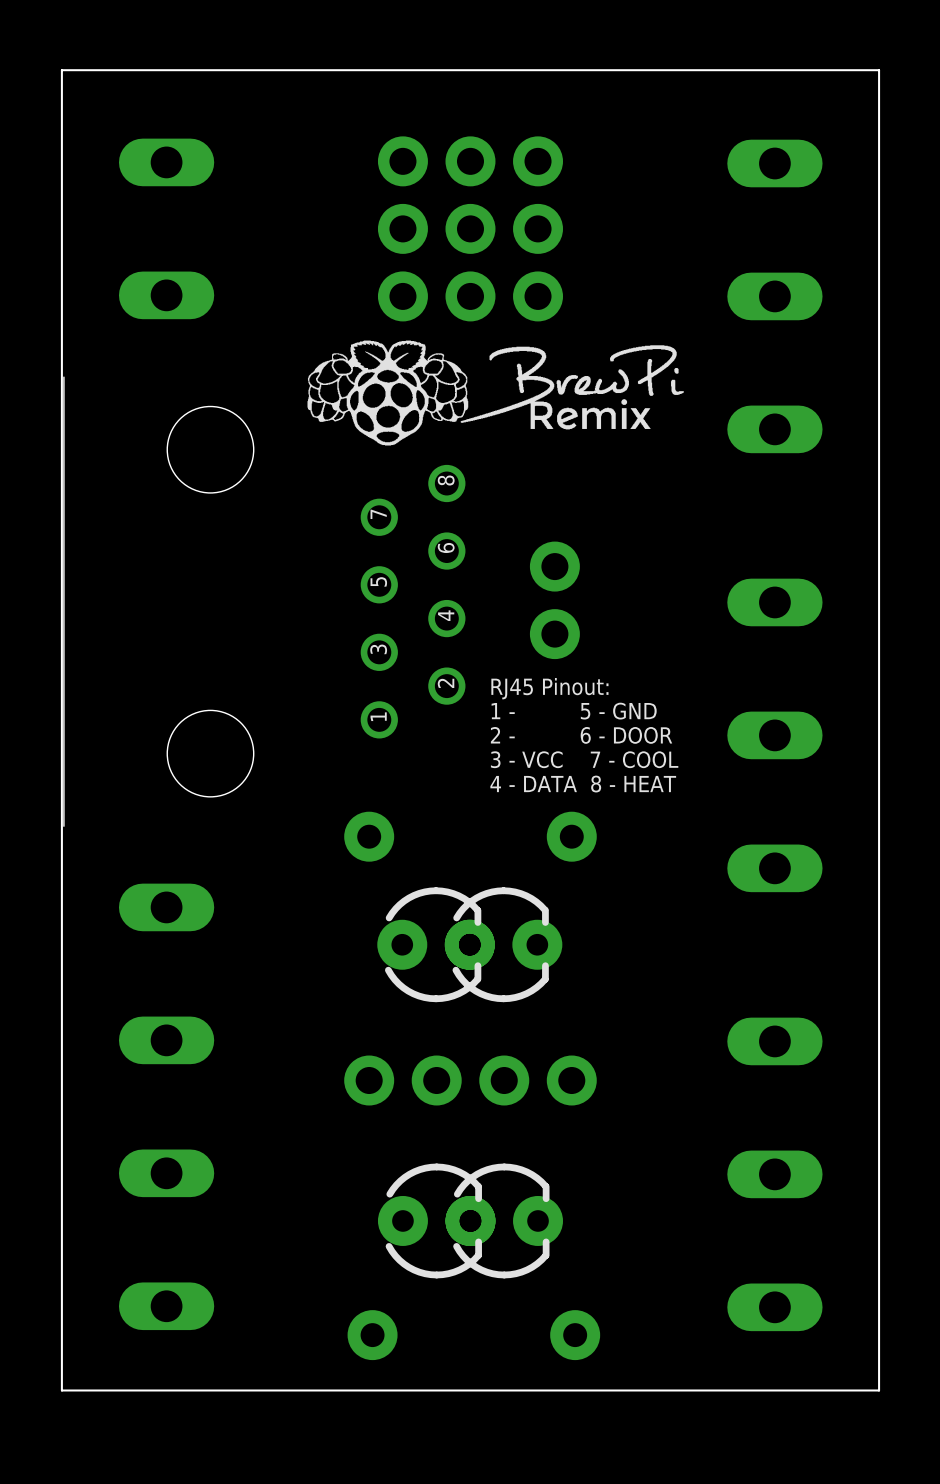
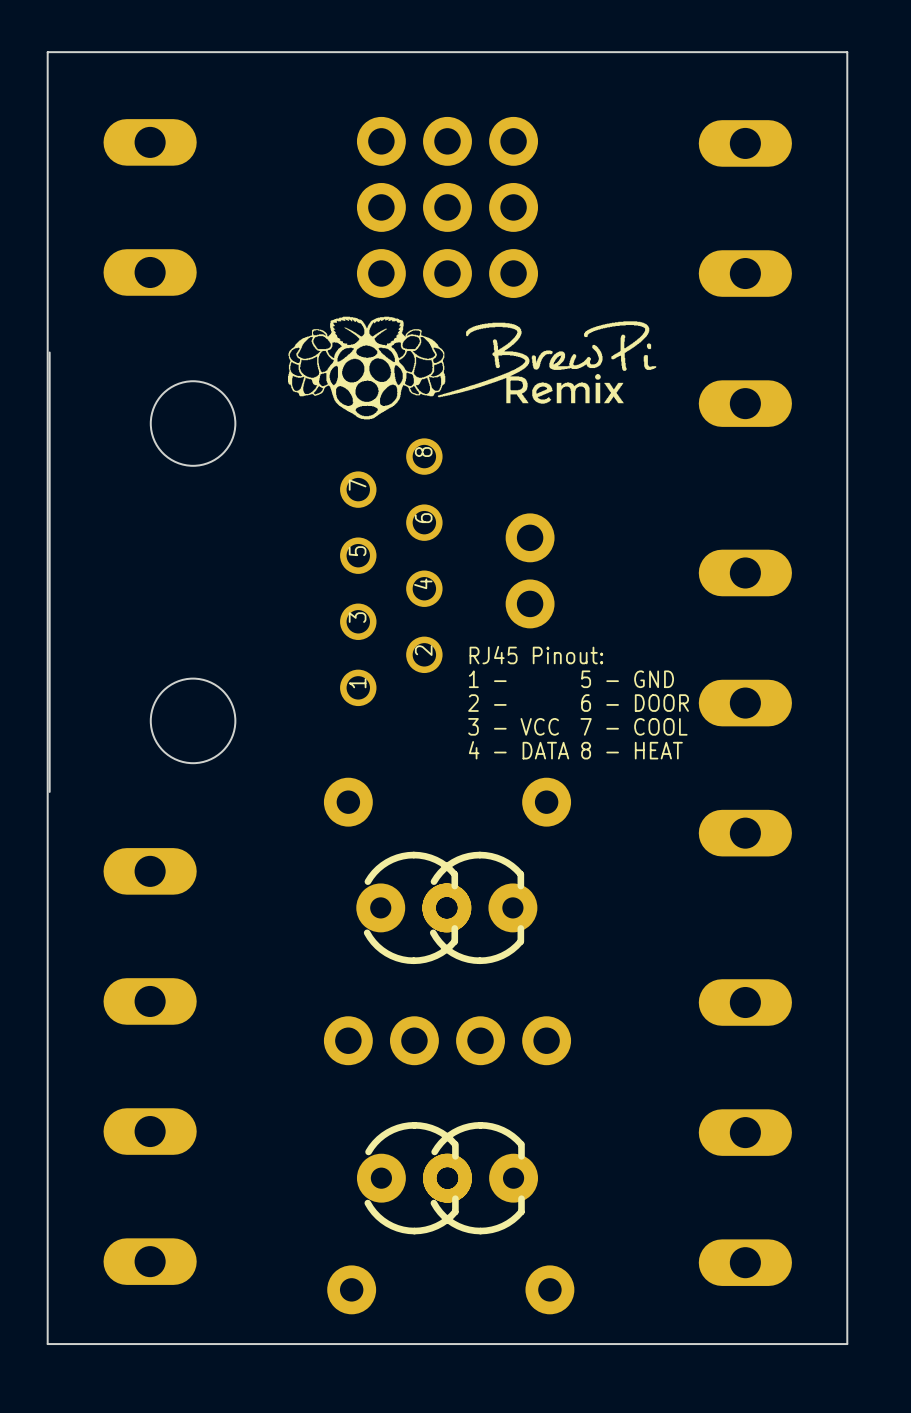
text: 1 - 5 - GND (574, 711) -> 1 - (487, 679)
text: none -> 5 - GND (627, 679)
text: 2 - 6 - DOOR (581, 735) -> 2 - (487, 703)
text: none -> 6 - DOOR (635, 703)
text: 3 - VCC 7 - COOL (584, 759) -> 3 - VCC (513, 726)
text: none -> 7 - COOL (634, 726)
text: 4 - DATA 8 - HEAT (583, 784) -> 4 - DATA (519, 750)
text: none -> 8 - HEAT (631, 750)

